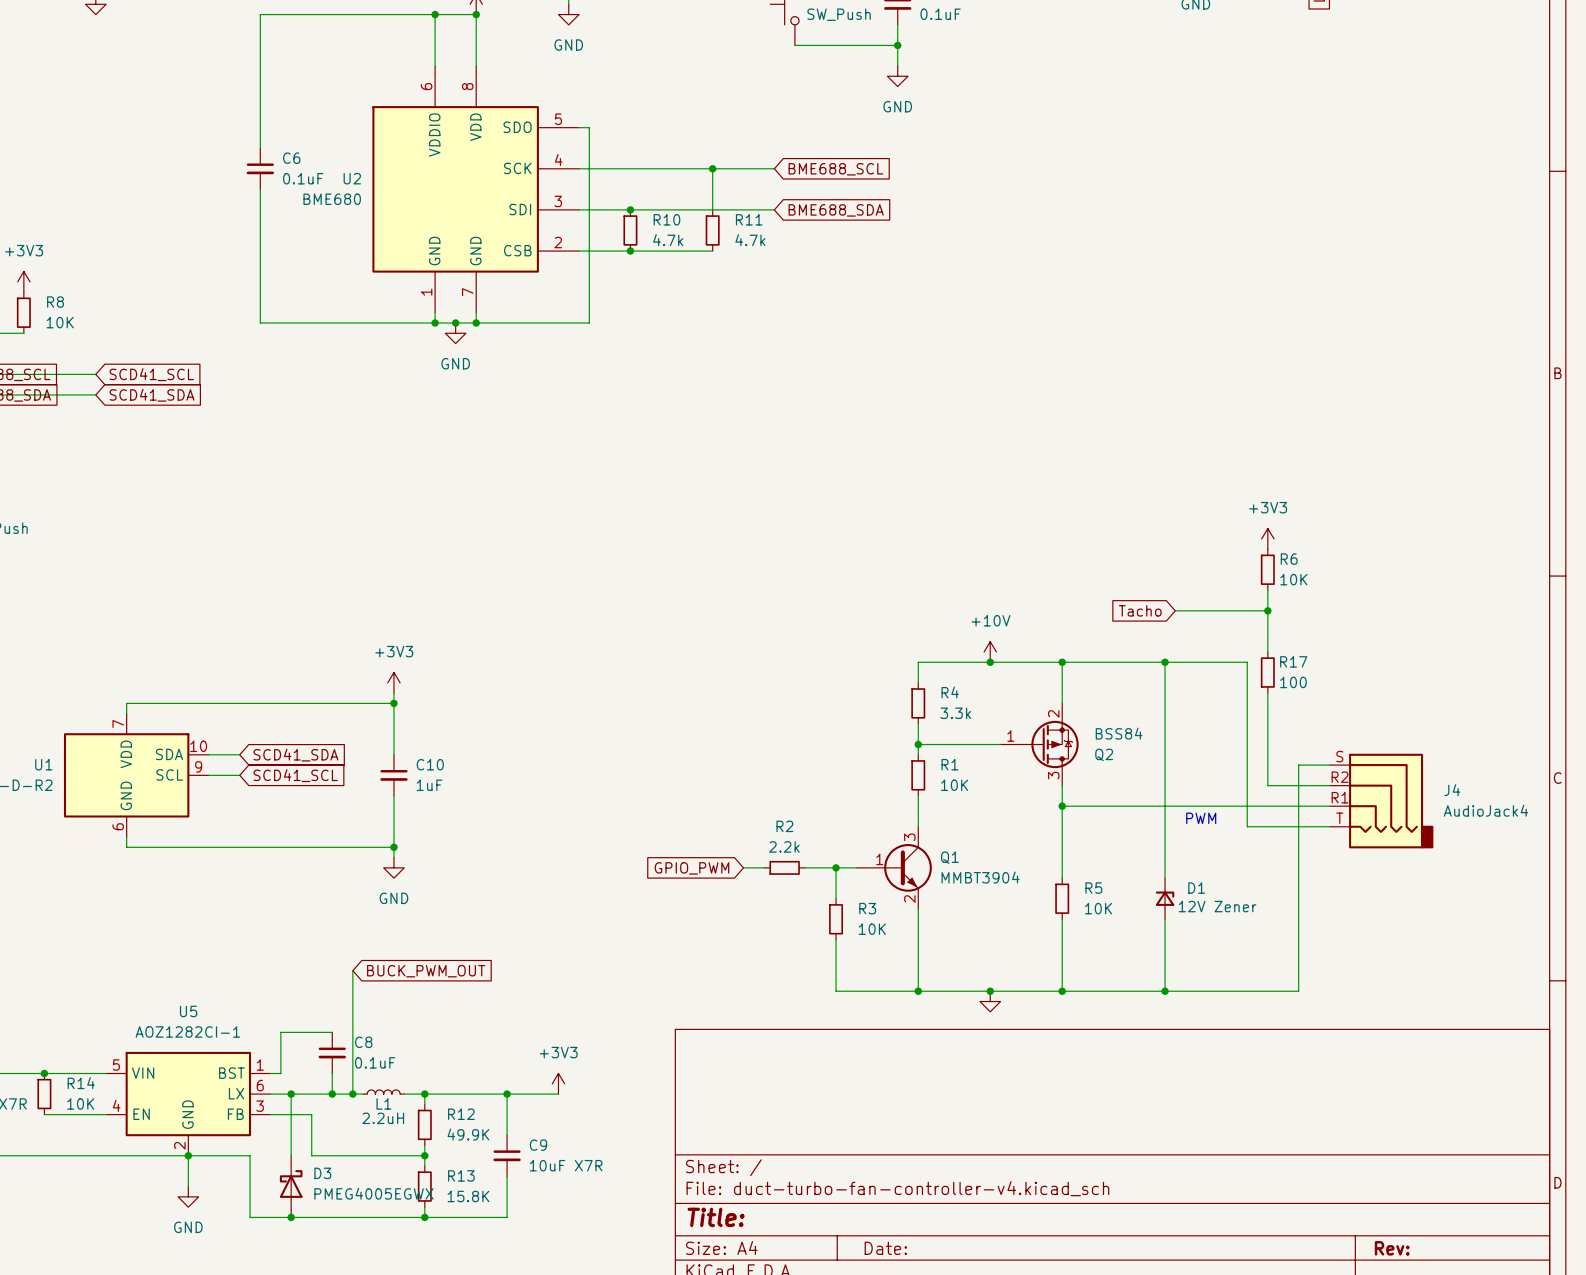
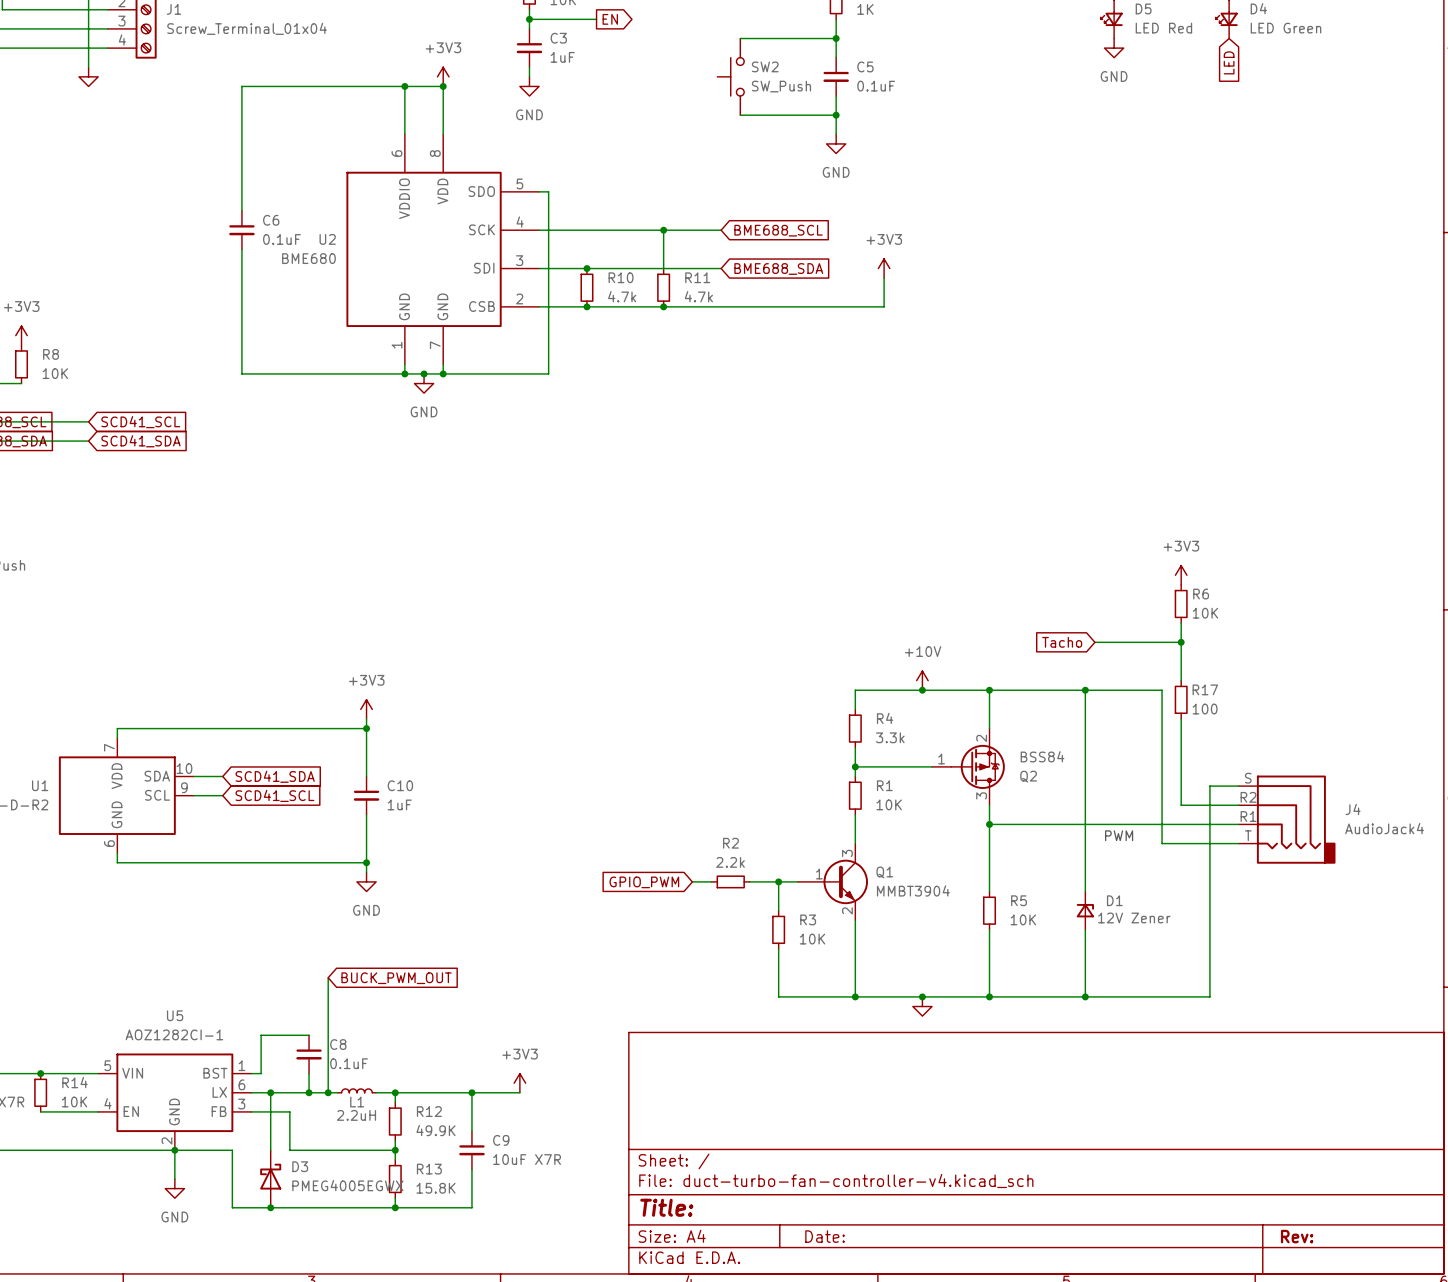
power symbol: none -> +3V3 (884, 268)
wire: none -> (884, 278) (884, 306) (663, 306)
junction: none -> (663, 306)

